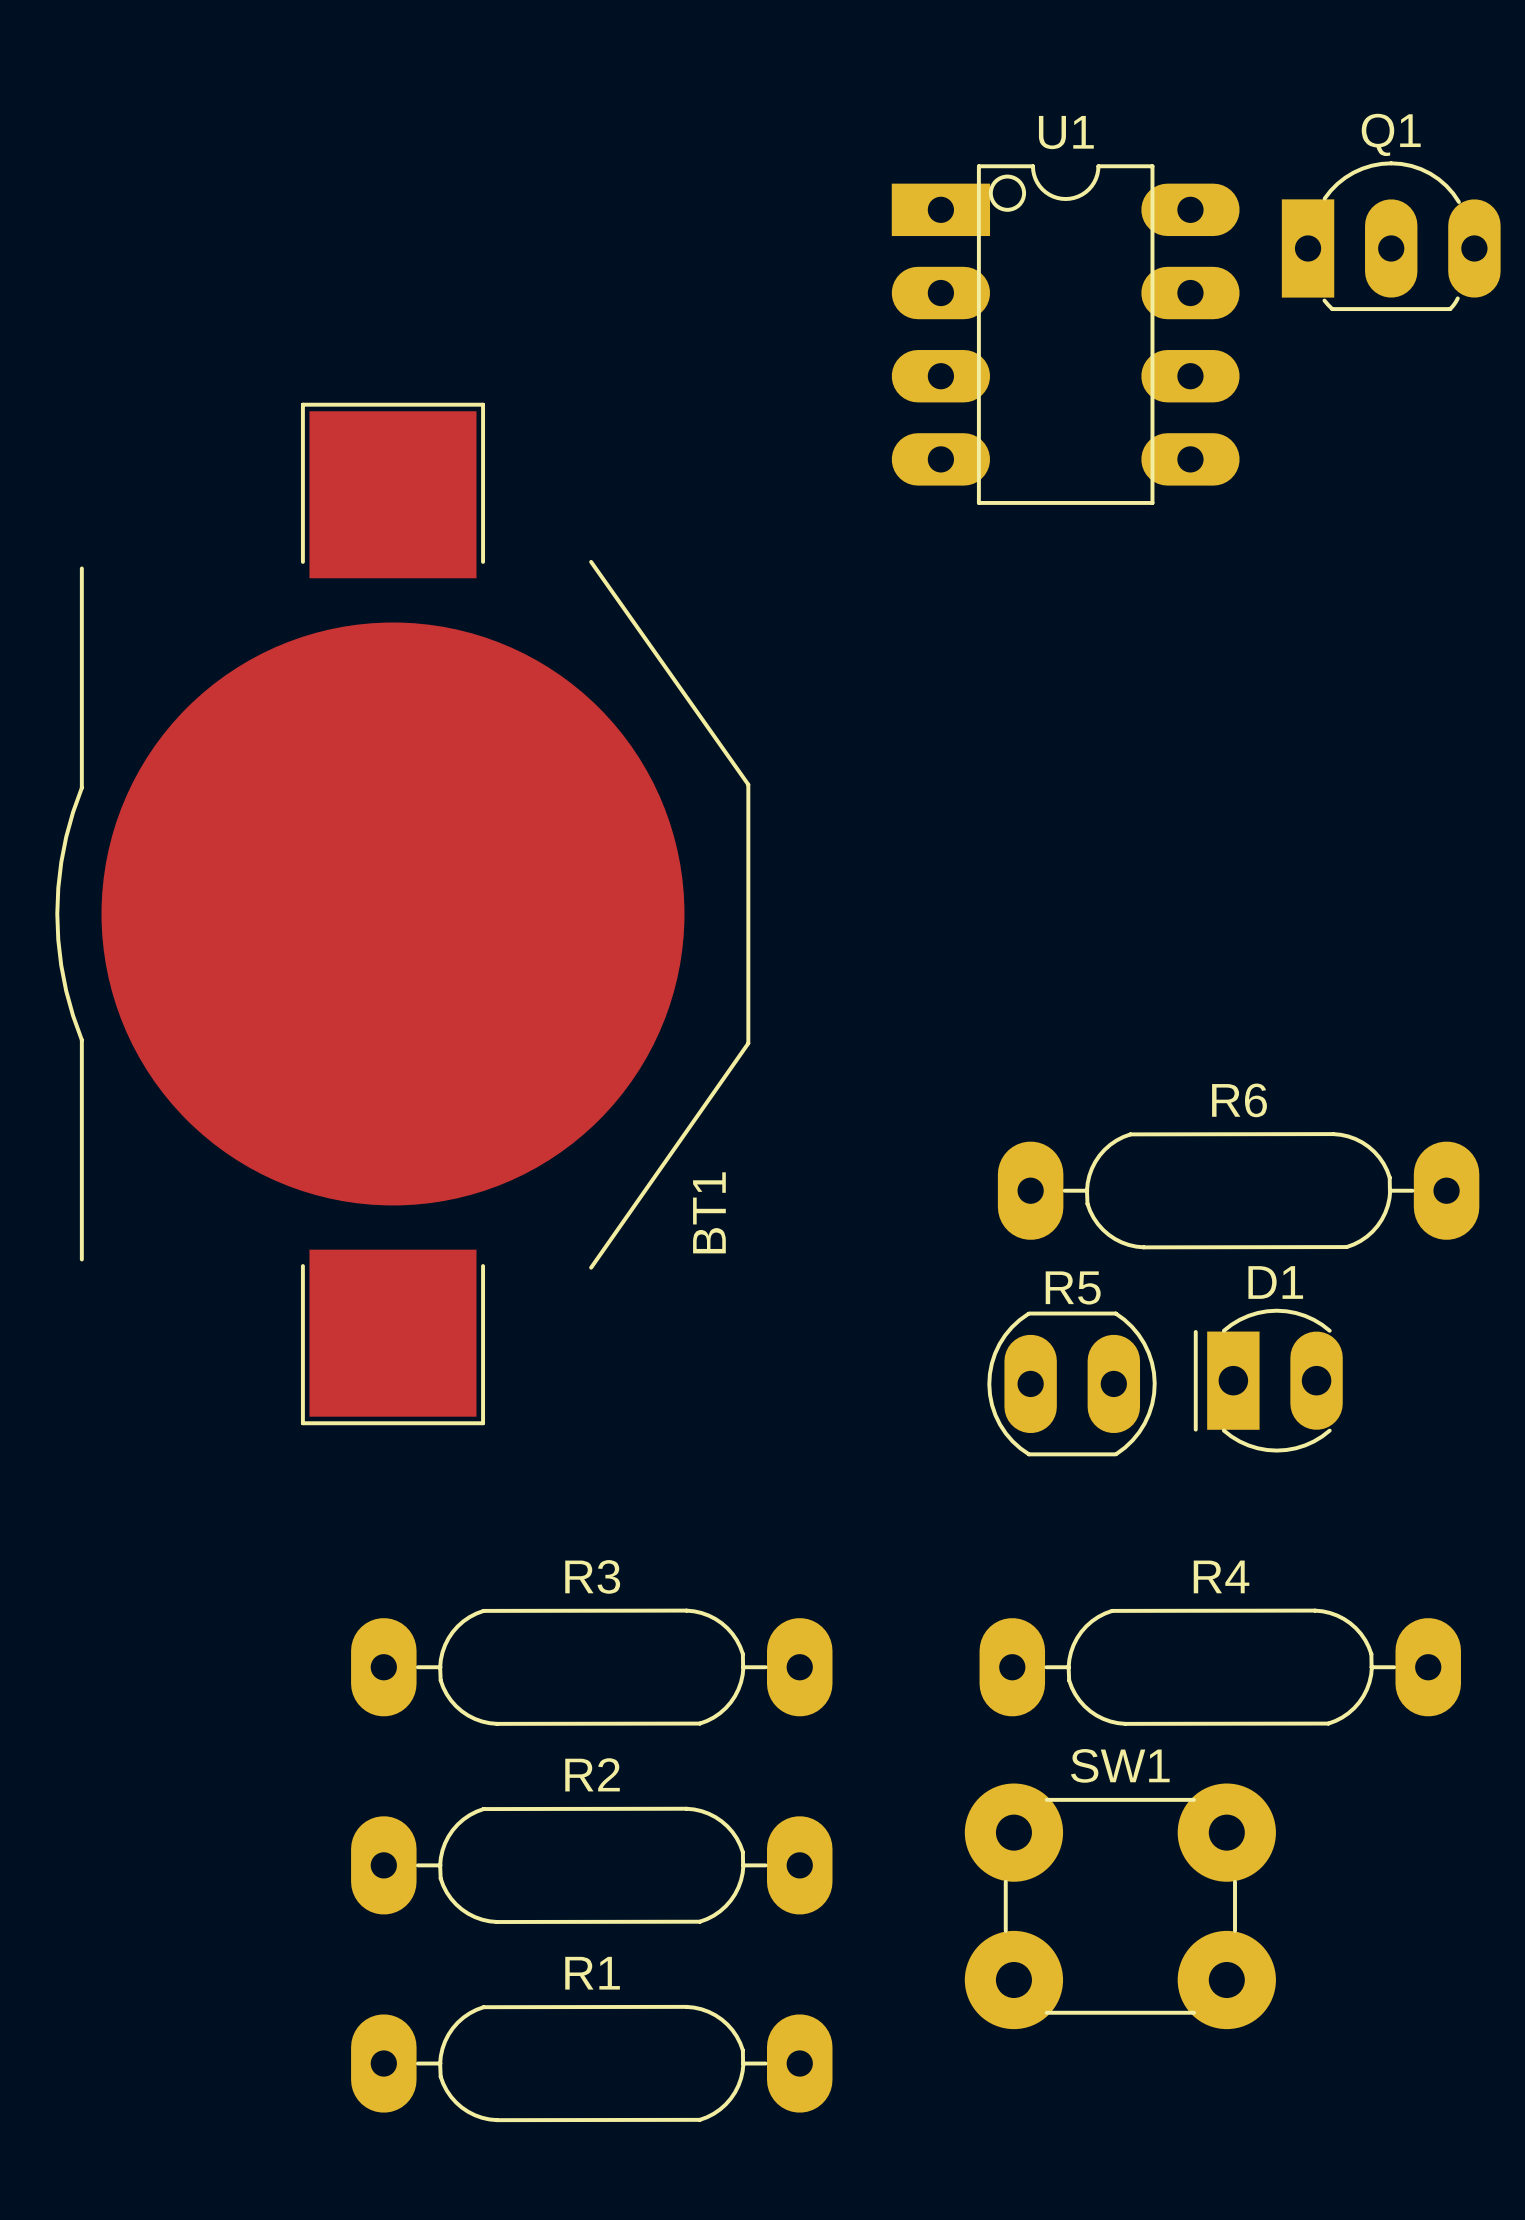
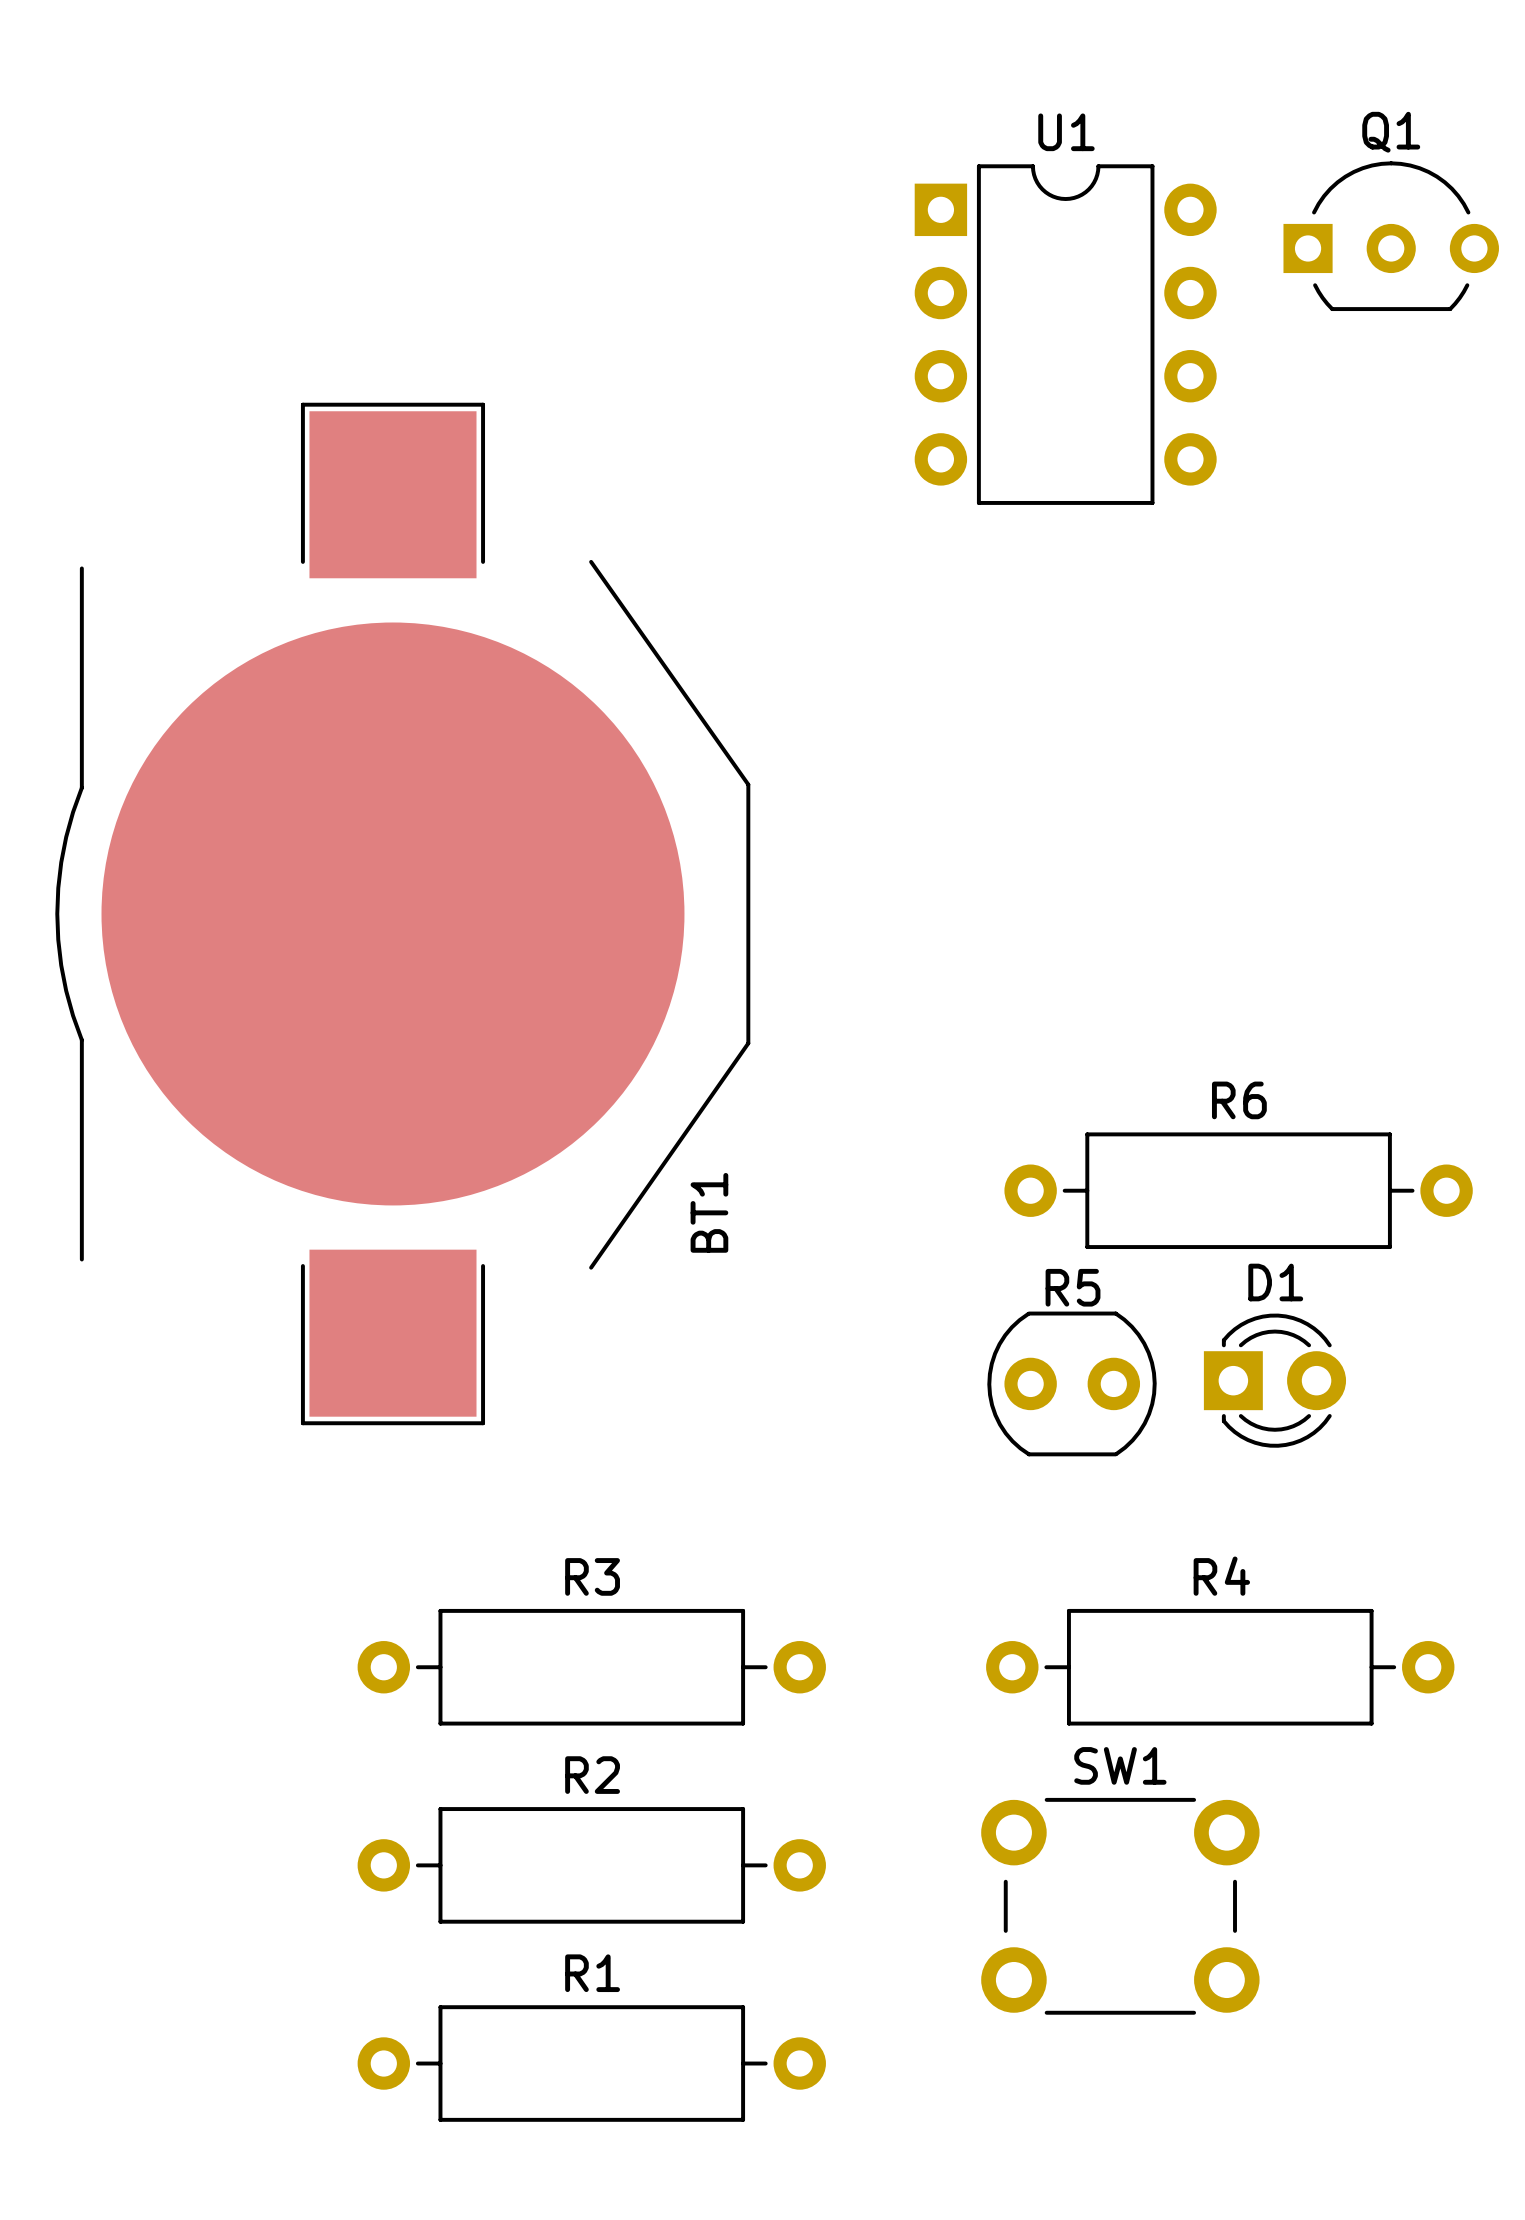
Q1 footprint: [1281, 161, 1501, 312] -> [1283, 161, 1499, 312]
U1 footprint: [891, 164, 1240, 505] -> [914, 164, 1217, 505]
R6 footprint: [997, 1132, 1480, 1250] -> [1004, 1132, 1473, 1250]
D1 footprint: [1193, 1308, 1343, 1453] -> [1203, 1313, 1347, 1448]
R5 footprint: [987, 1311, 1157, 1457] -> [987, 1311, 1157, 1457]
R3 footprint: [351, 1608, 833, 1726] -> [357, 1608, 826, 1726]
R4 footprint: [979, 1608, 1461, 1726] -> [986, 1608, 1455, 1726]
SW1 footprint: [964, 1783, 1276, 2030] -> [981, 1797, 1260, 2015]
R2 footprint: [351, 1806, 833, 1924] -> [357, 1807, 826, 1924]
R1 footprint: [351, 2004, 833, 2123] -> [357, 2005, 826, 2122]

